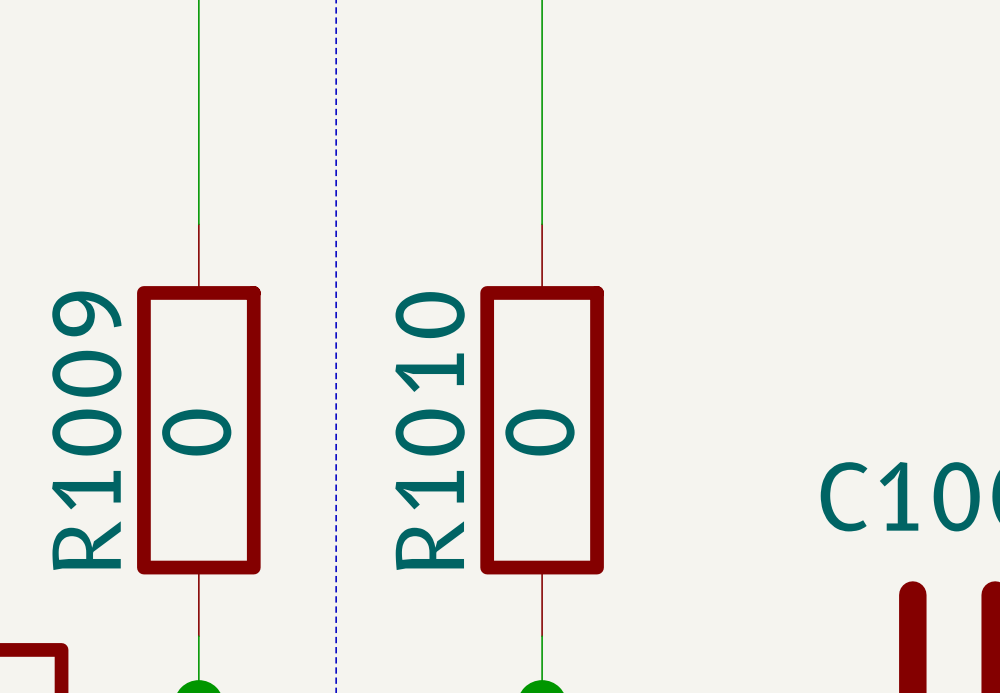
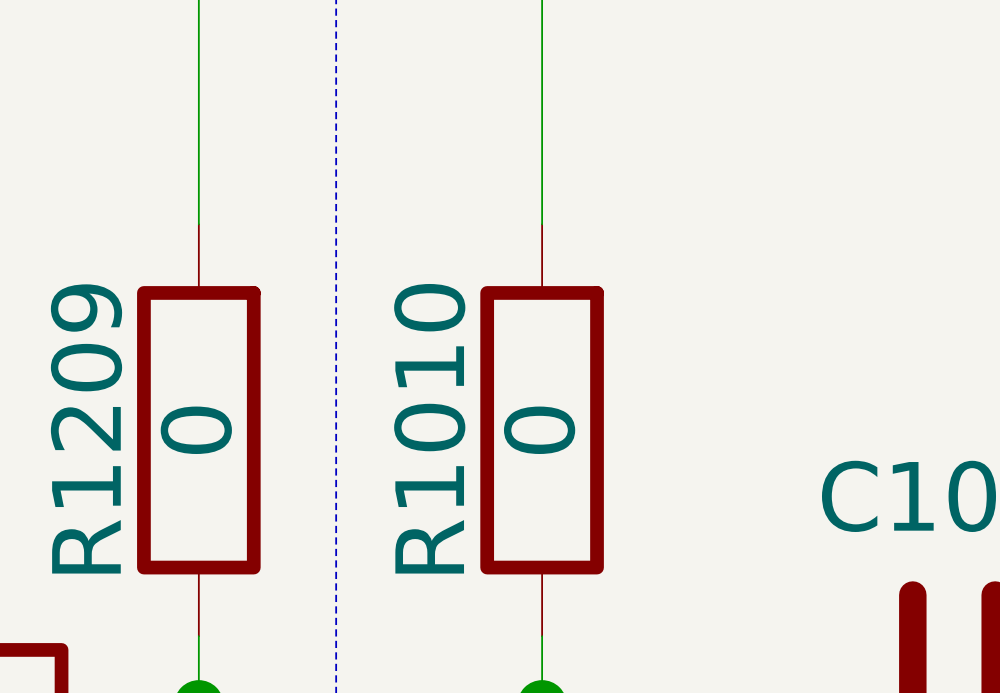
R1009 name: R1009 (86, 430) -> R1209 (86, 428)

